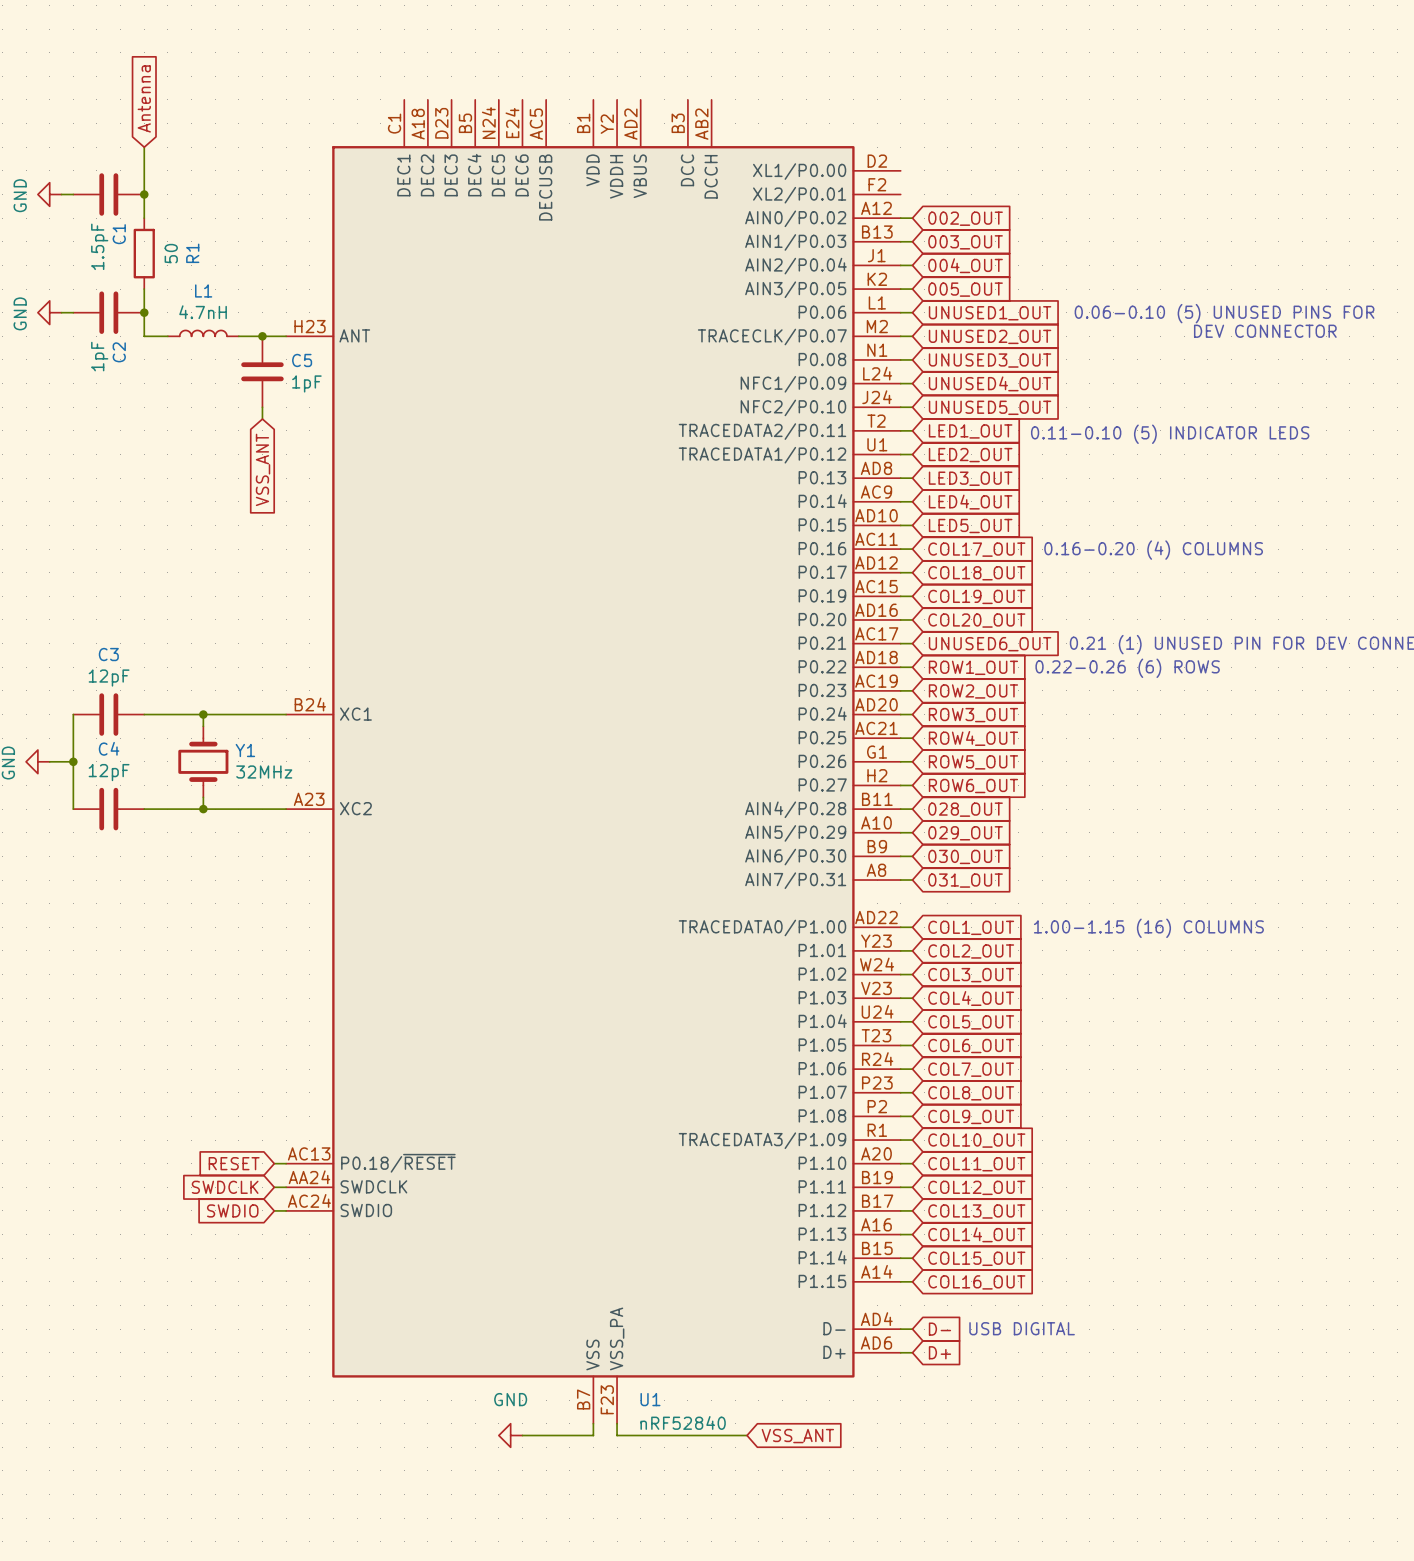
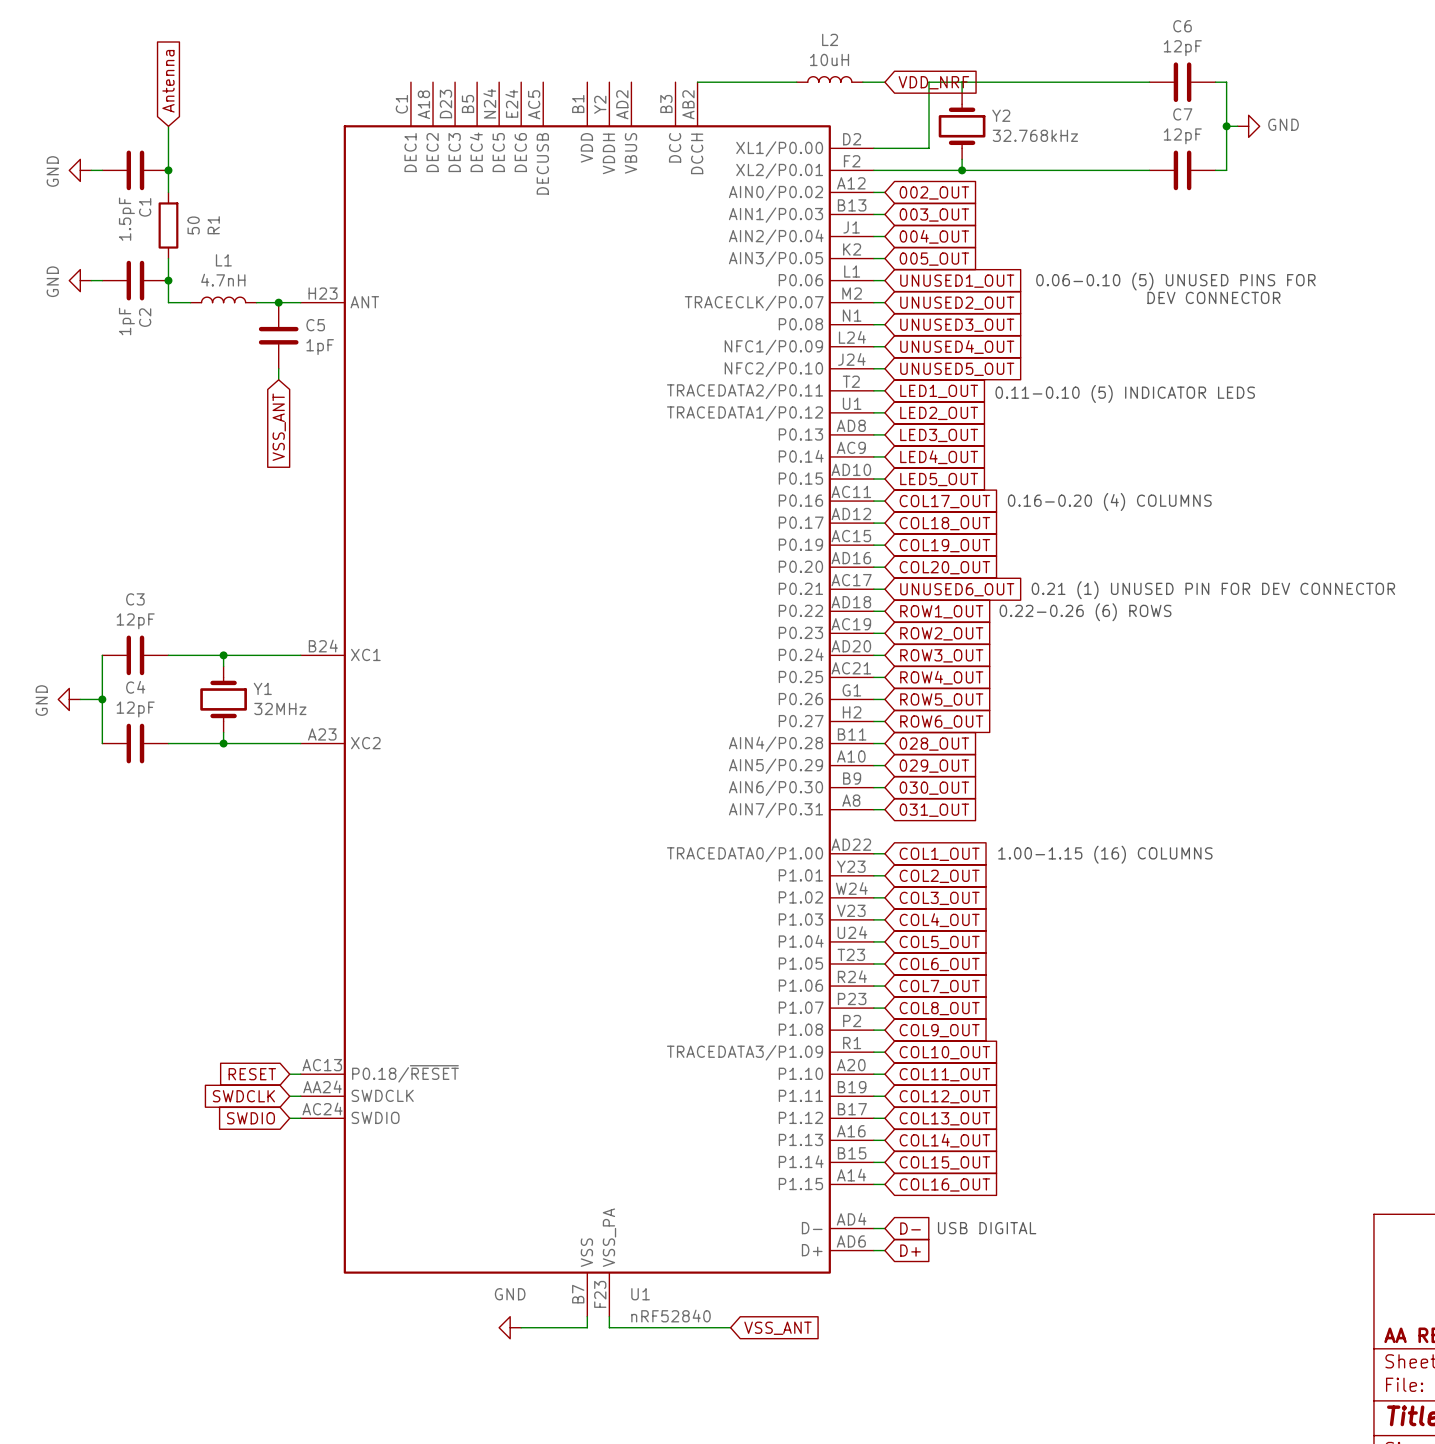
L2: none -> 10uH (829, 79)
wire: none -> (697, 82) (796, 82)
wire: none -> (862, 82) (884, 82)
wire: none -> (962, 82) (962, 93)
wire: none -> (1149, 82) (929, 82) (929, 148) (873, 148)
C6: none -> 12pF (1182, 82)
wire: none -> (1215, 82) (1226, 82) (1226, 170) (1215, 170)
global label: none -> VDD_NRF (933, 82)
Y2: none -> 32.768kHz (962, 126)
wire: none -> (1226, 126) (1237, 126)
junction: none -> (1226, 126)
power symbol: none -> GND (1248, 126)
wire: none -> (962, 159) (962, 170)
wire: none -> (873, 170) (1149, 170)
junction: none -> (962, 170)
C7: none -> 12pF (1182, 170)

